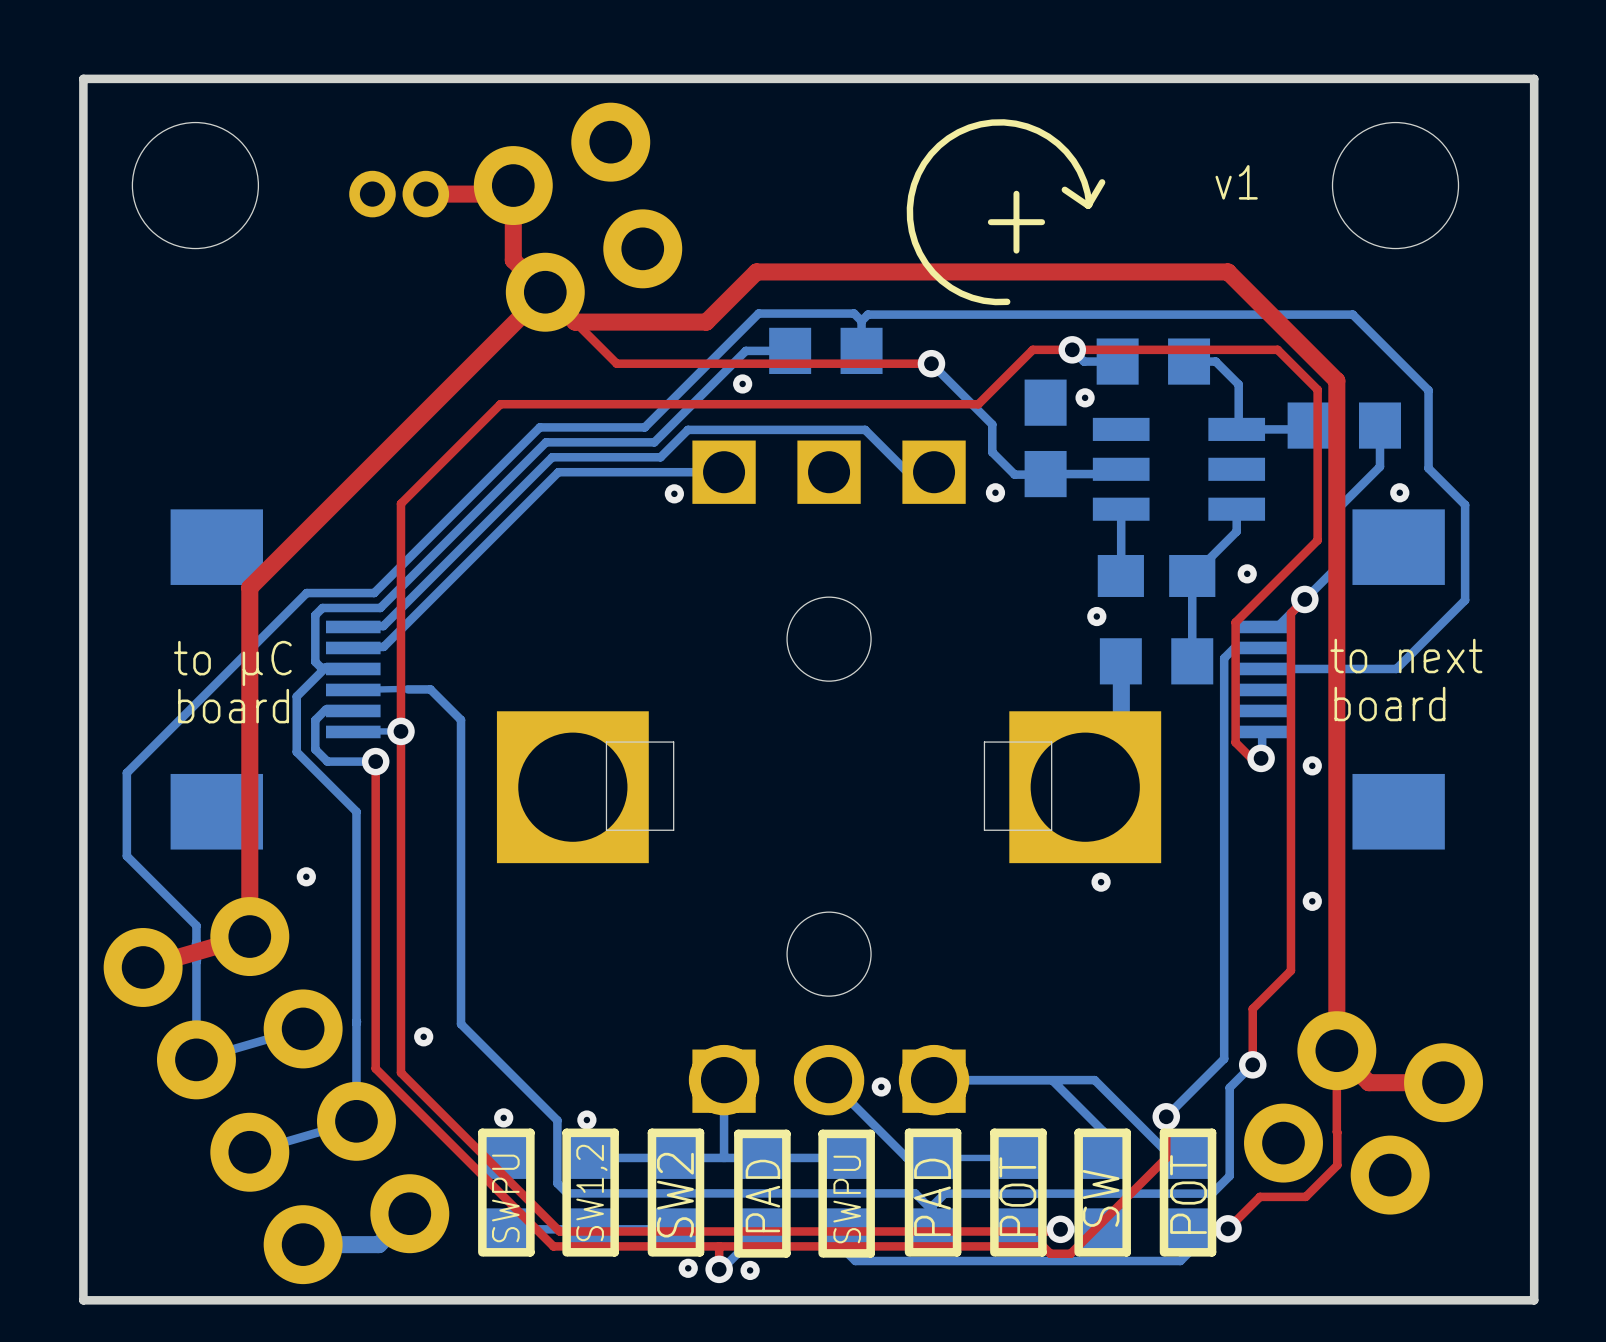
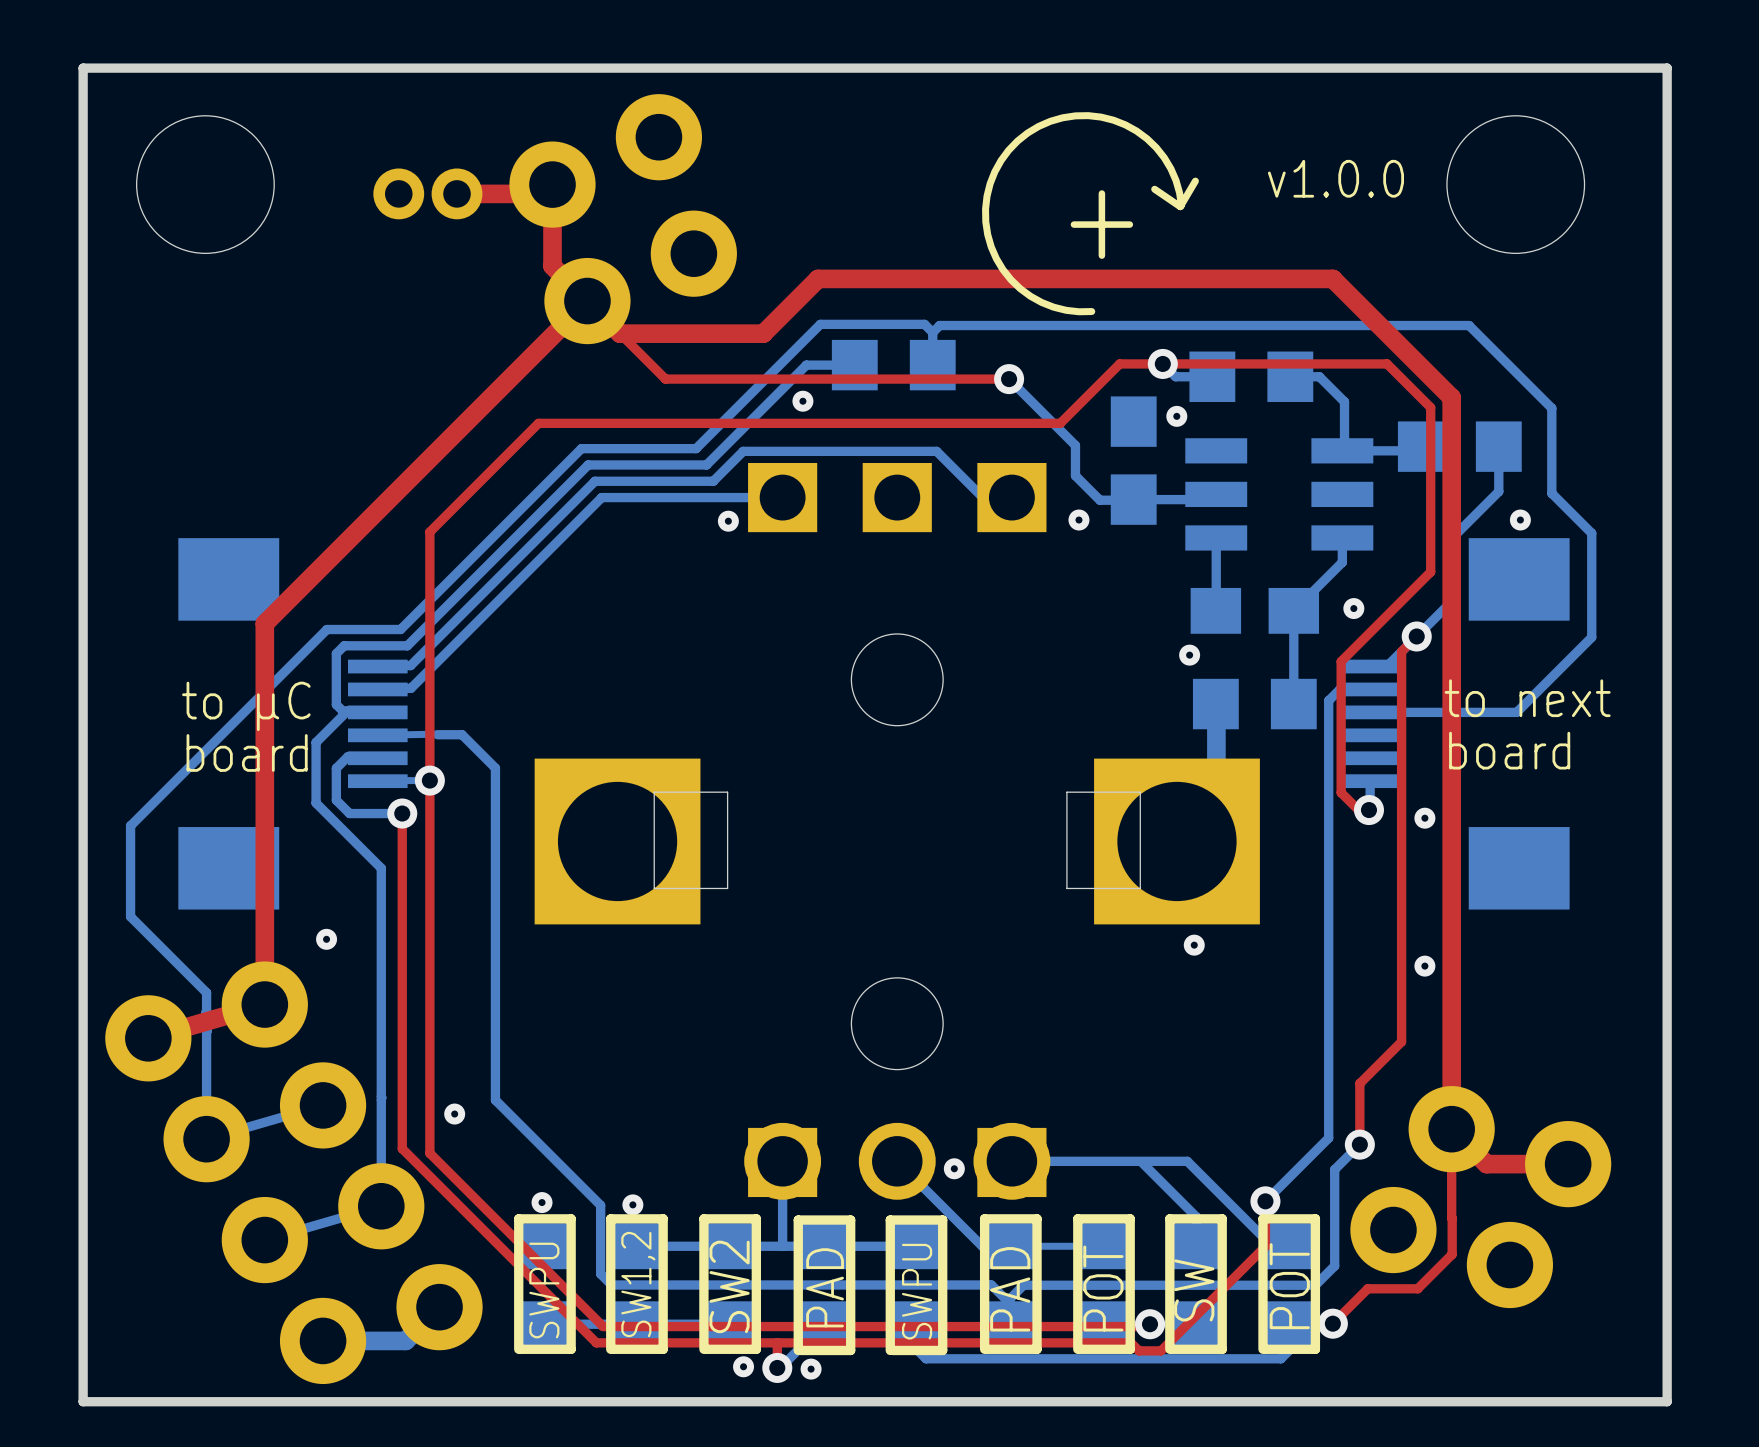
text: none -> v1.0.0 (1335, 178)
text: v1 (1236, 182) -> none

